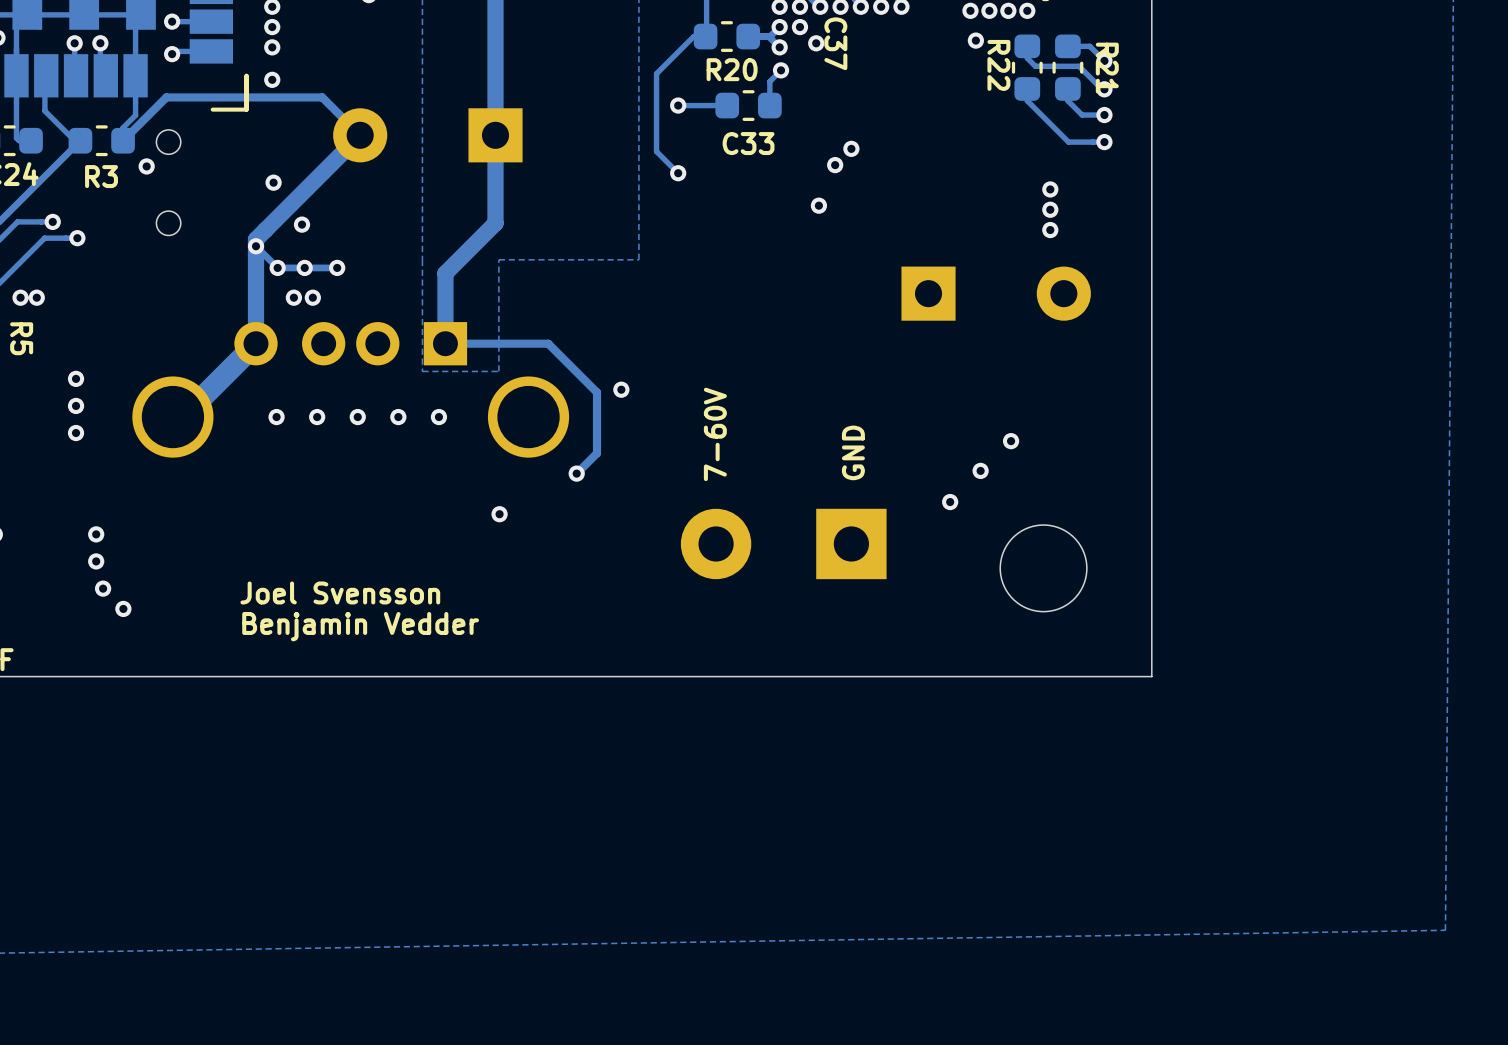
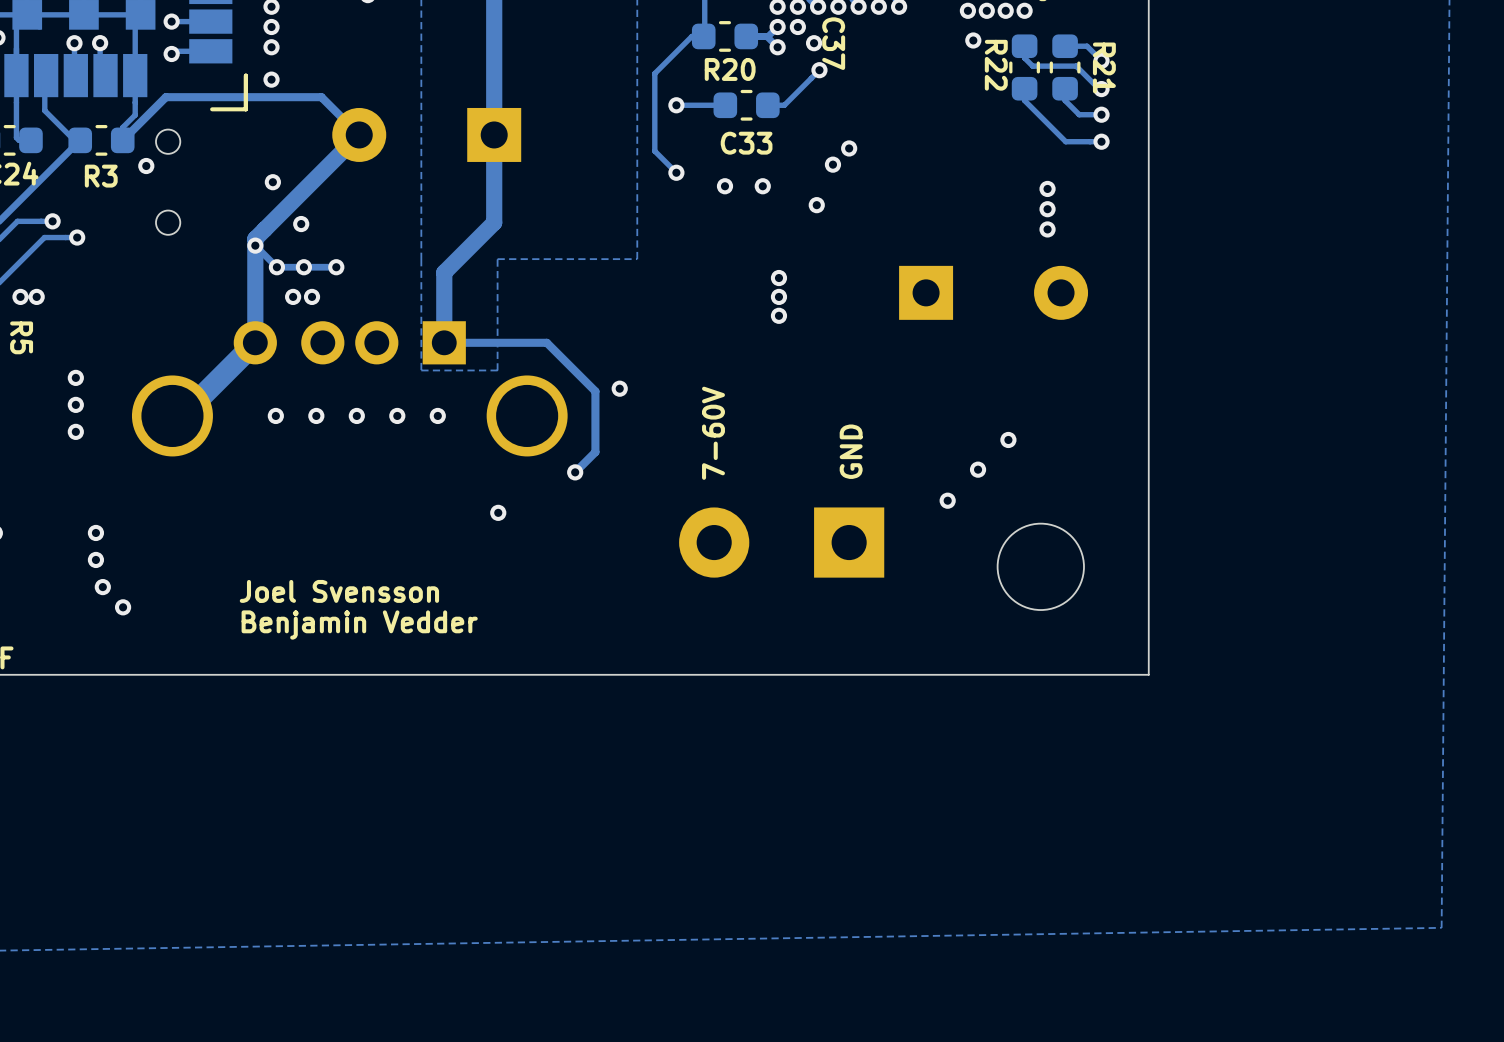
track: (781, 70) (769, 81) (769, 105) -> (819, 70) (784, 105) (767, 105)
via position: (781, 70) -> (819, 70)
via: none -> (724, 186)
via: none -> (762, 186)
via: none -> (778, 278)
via: none -> (778, 296)
via: none -> (778, 315)

